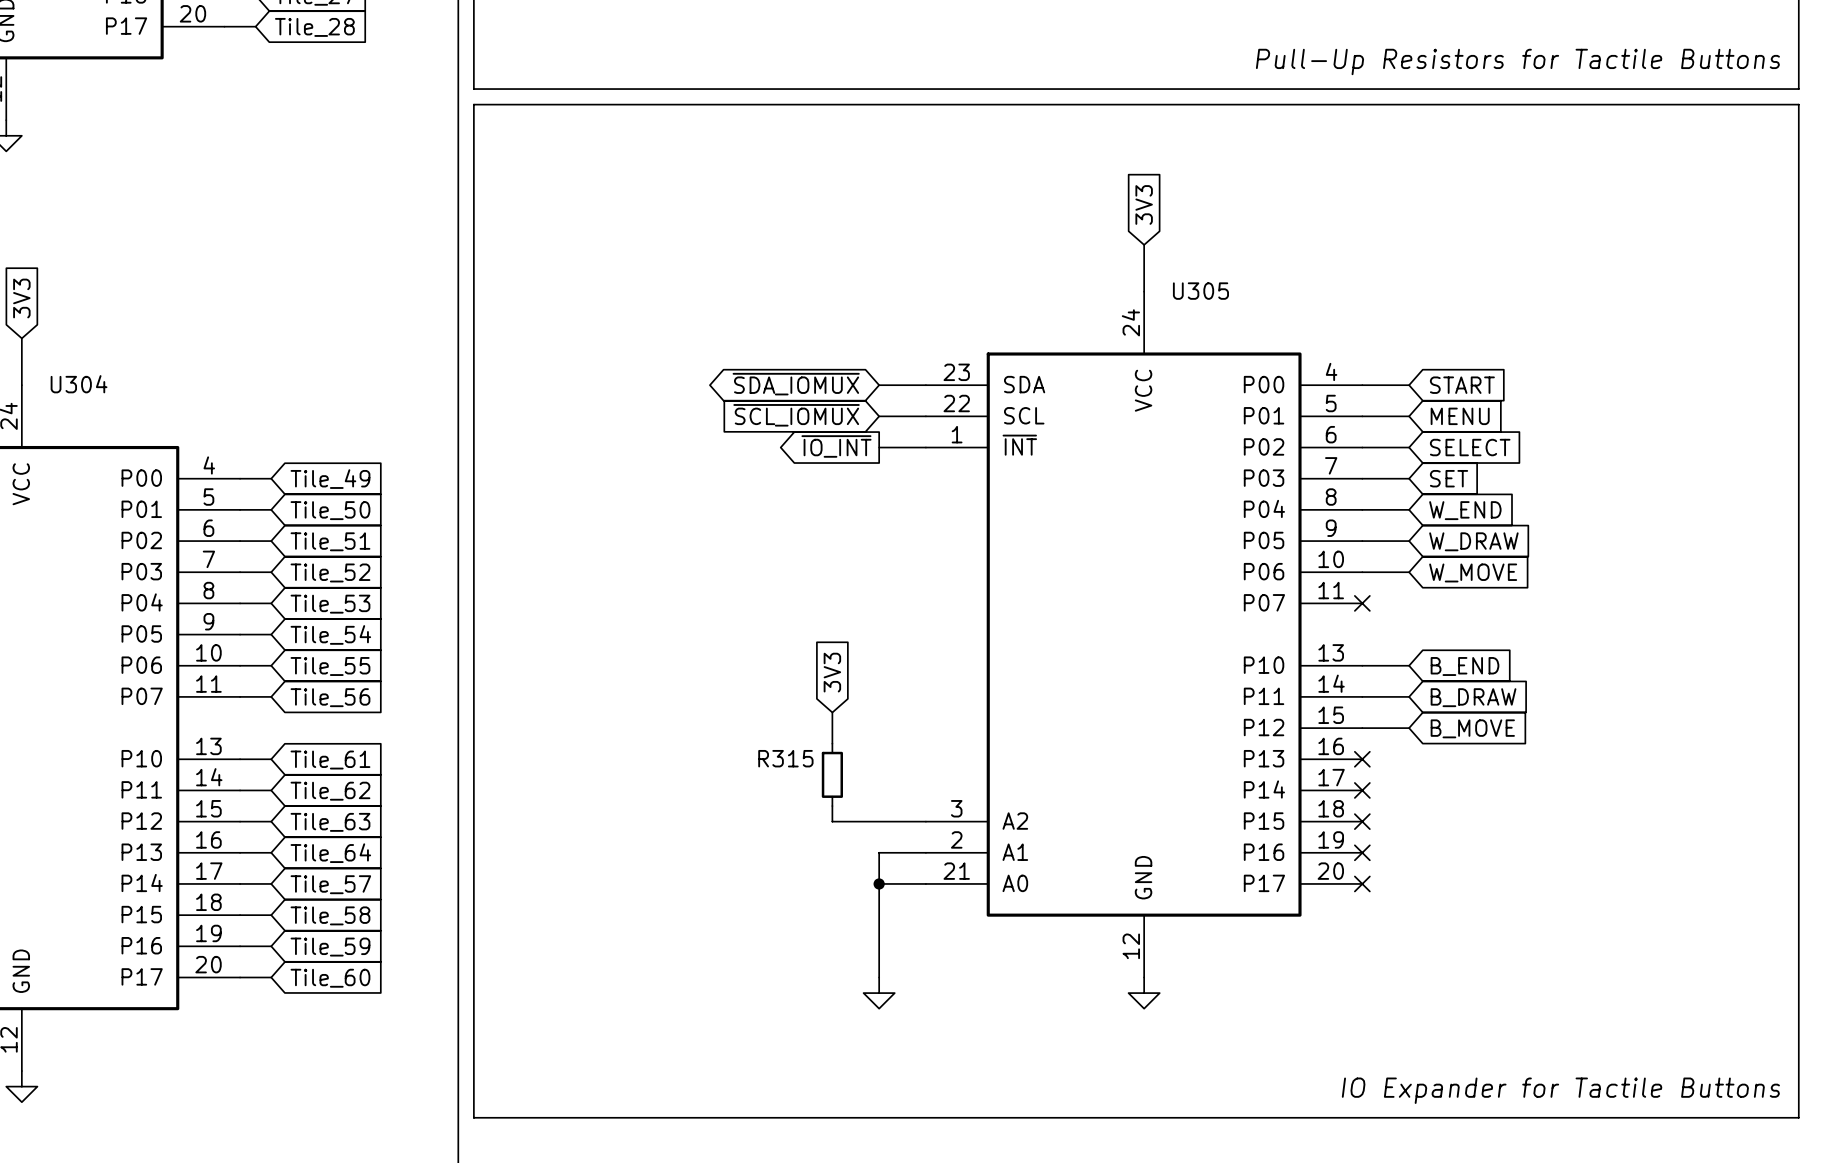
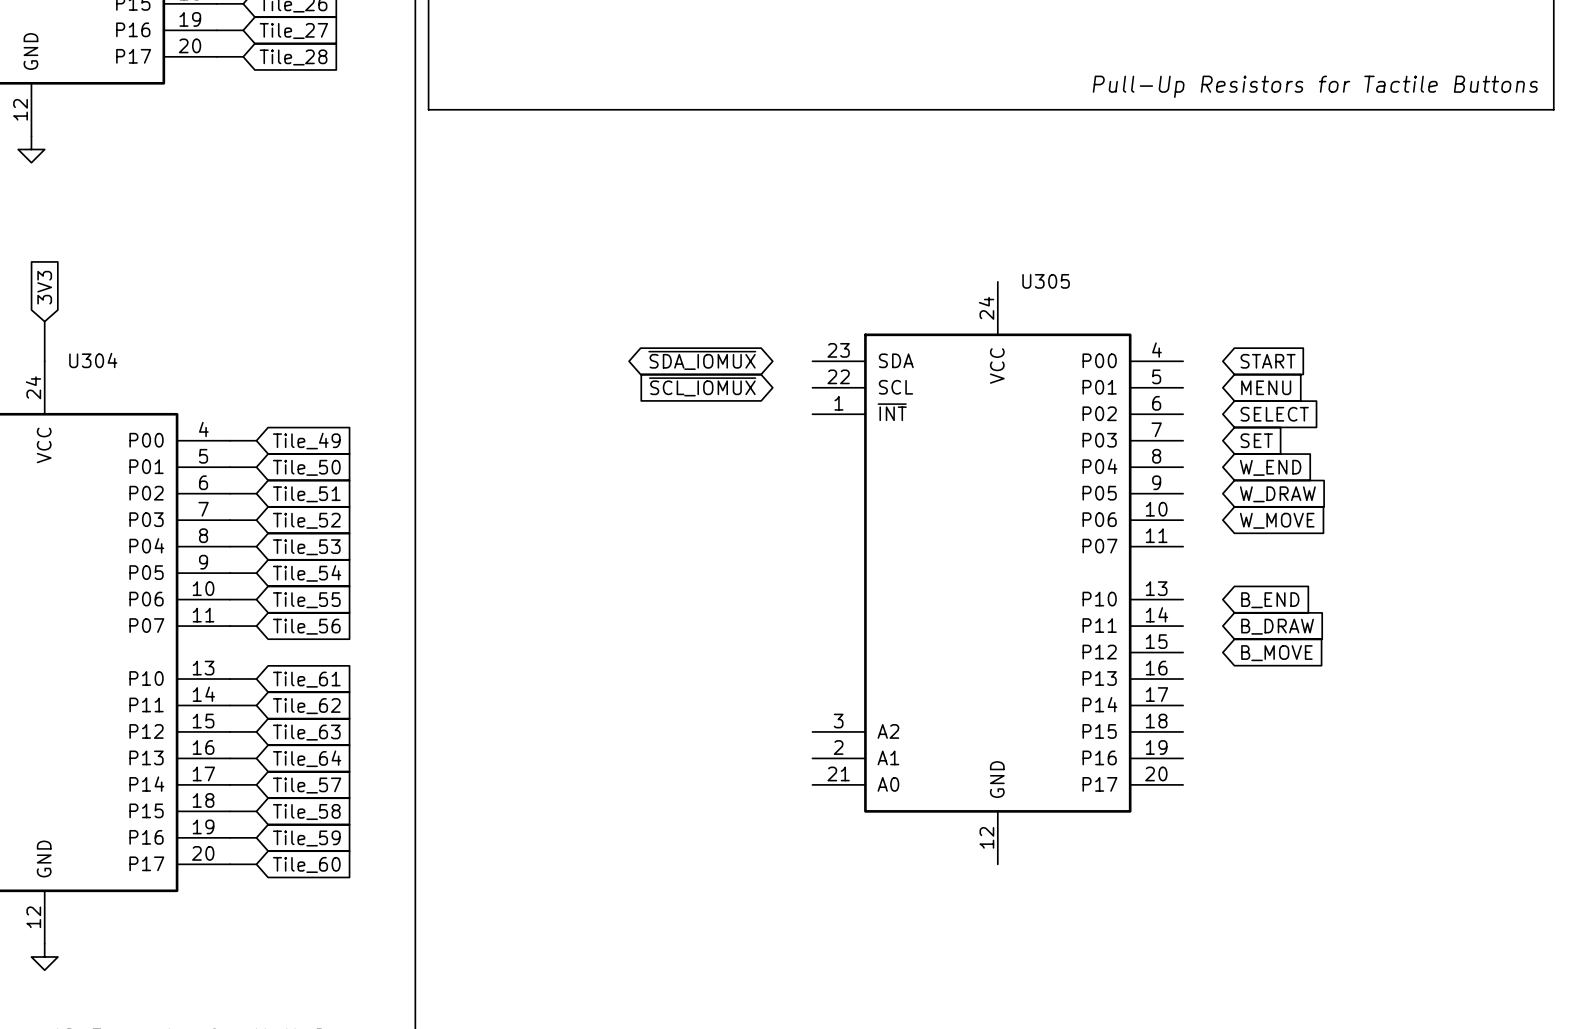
line: (473, 104) (1798, 104) (1798, 1117) (473, 1117) (473, 104) -> none
global label: 3V3 (1144, 204) -> none
wire: (1144, 244) (1144, 291) -> none
wire: (879, 385) (925, 385) -> none
wire: (1362, 385) (1409, 385) -> none
wire: (879, 416) (925, 416) -> none
wire: (1362, 416) (1409, 416) -> none
global label: ~{IO_INT} (836, 446) -> none
wire: (879, 447) (925, 447) -> none
wire: (1362, 447) (1409, 447) -> none
wire: (1362, 478) (1409, 478) -> none
wire: (1362, 509) (1409, 509) -> none
wire: (1362, 541) (1409, 541) -> none
wire: (1362, 572) (1409, 572) -> none
no-connect mark: (1362, 603) -> none
wire: (1362, 665) (1409, 665) -> none
global label: 3V3 (832, 672) -> none
wire: (1362, 696) (1409, 696) -> none
wire: (832, 712) (832, 743) -> none
wire: (1362, 728) (1409, 728) -> none
no-connect mark: (1362, 759) -> none
R315: (832, 774) -> none
no-connect mark: (1362, 790) -> none
wire: (832, 806) (832, 821) (925, 821) -> none
no-connect mark: (1362, 821) -> none
wire: (925, 852) (879, 852) (879, 977) -> none
no-connect mark: (1362, 852) -> none
wire: (879, 883) (925, 883) -> none
junction: (879, 883) -> none
no-connect mark: (1362, 883) -> none
power symbol: (879, 993) -> none
power symbol: (1144, 993) -> none
text: IO Expander for Tactile Buttons (1560, 1090) -> none

